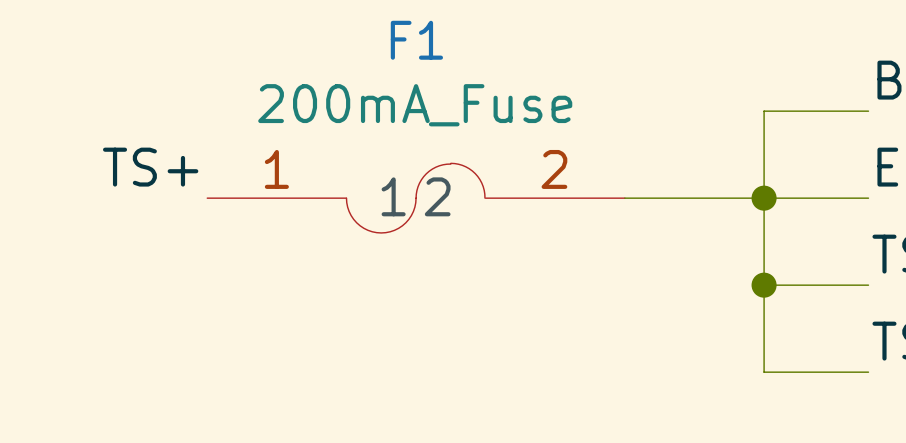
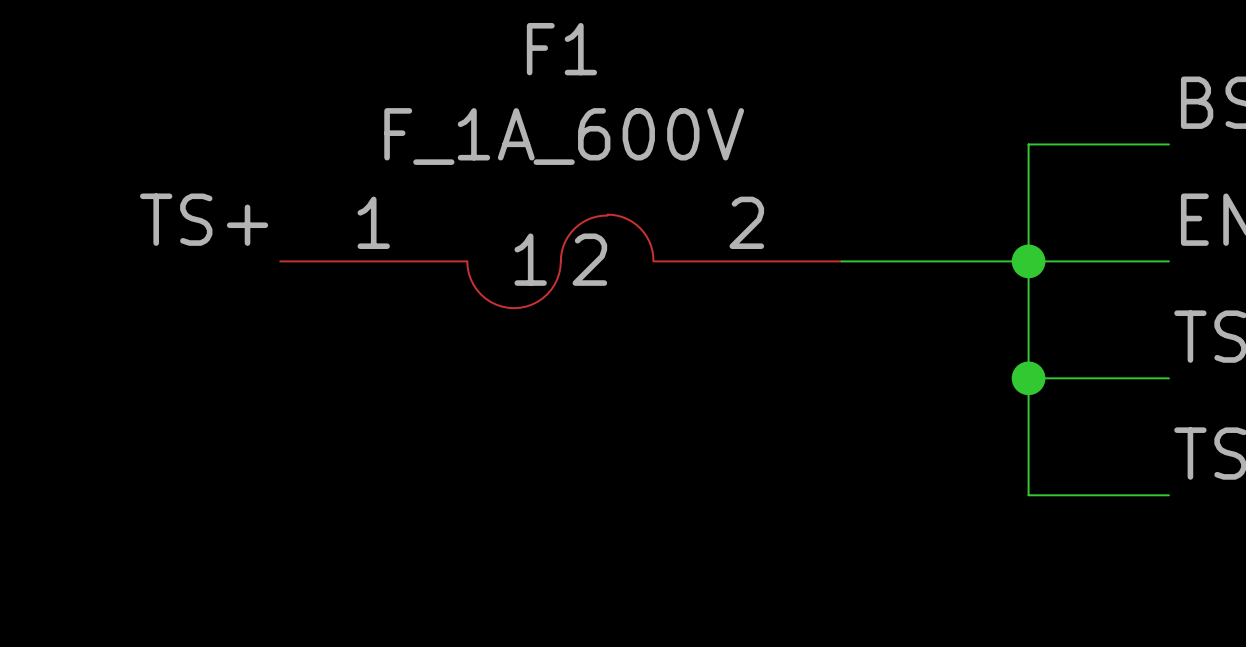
F1 value: 200mA_Fuse (415, 105) -> F_1A_600V (564, 136)

